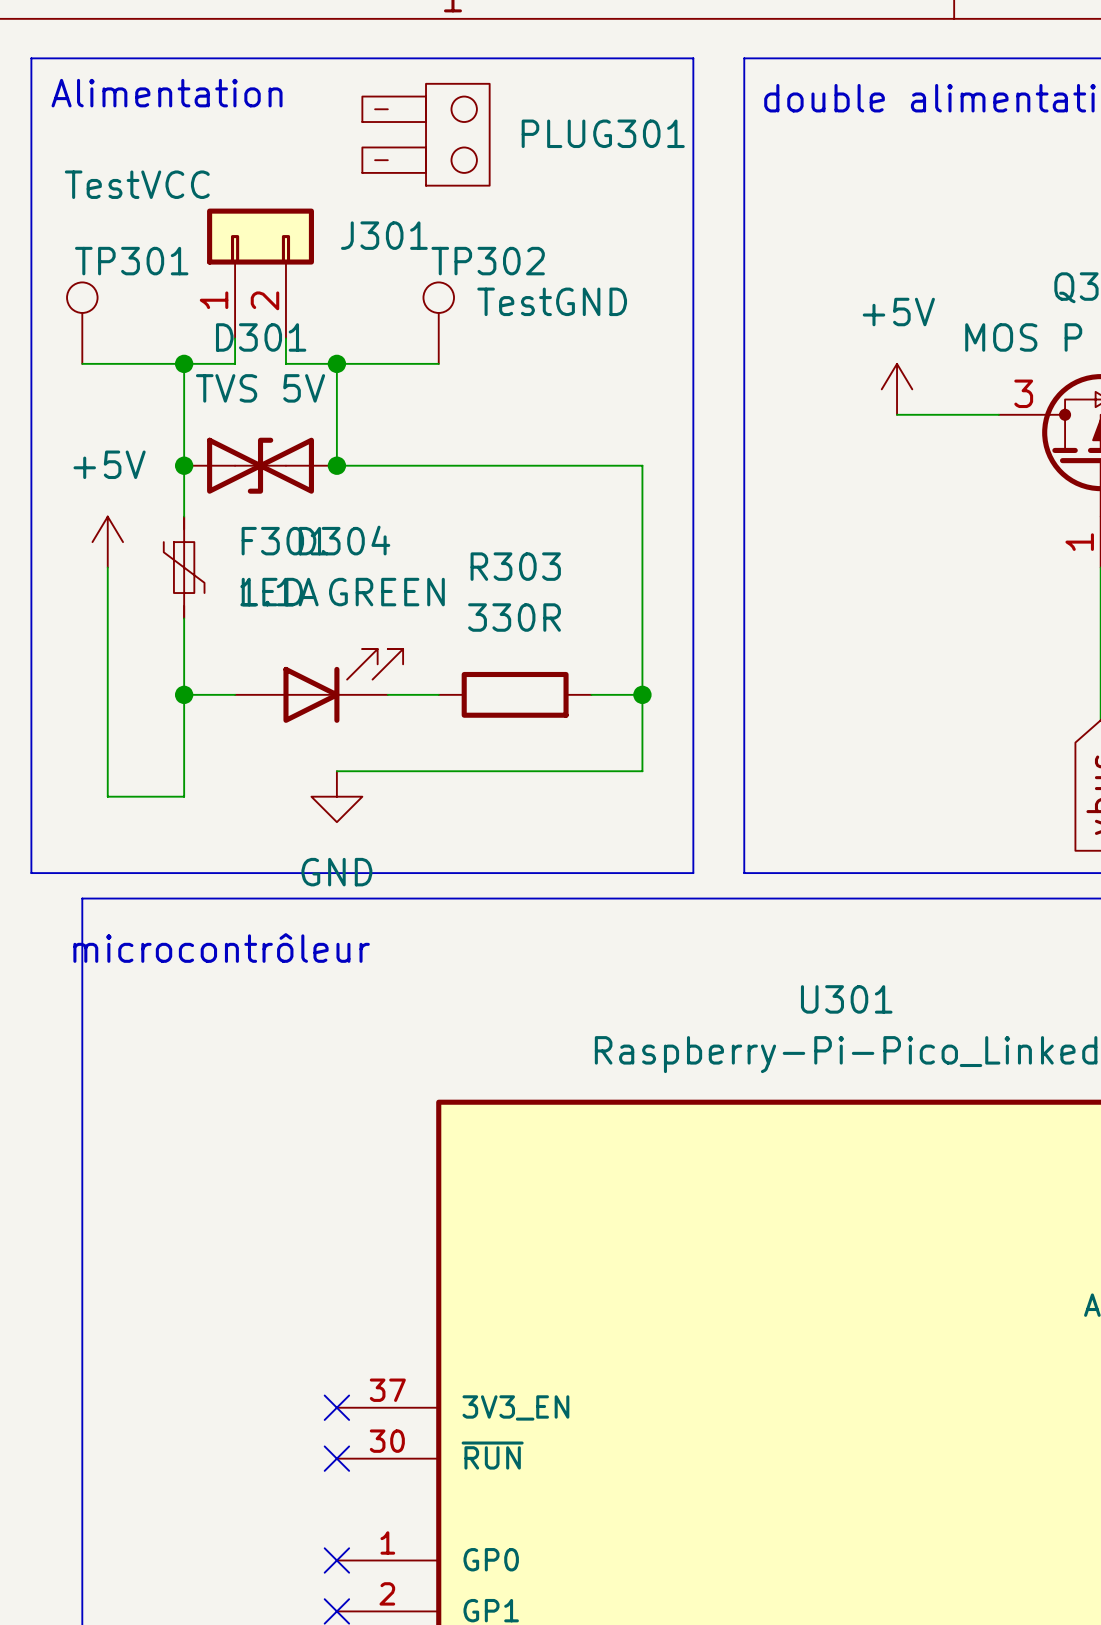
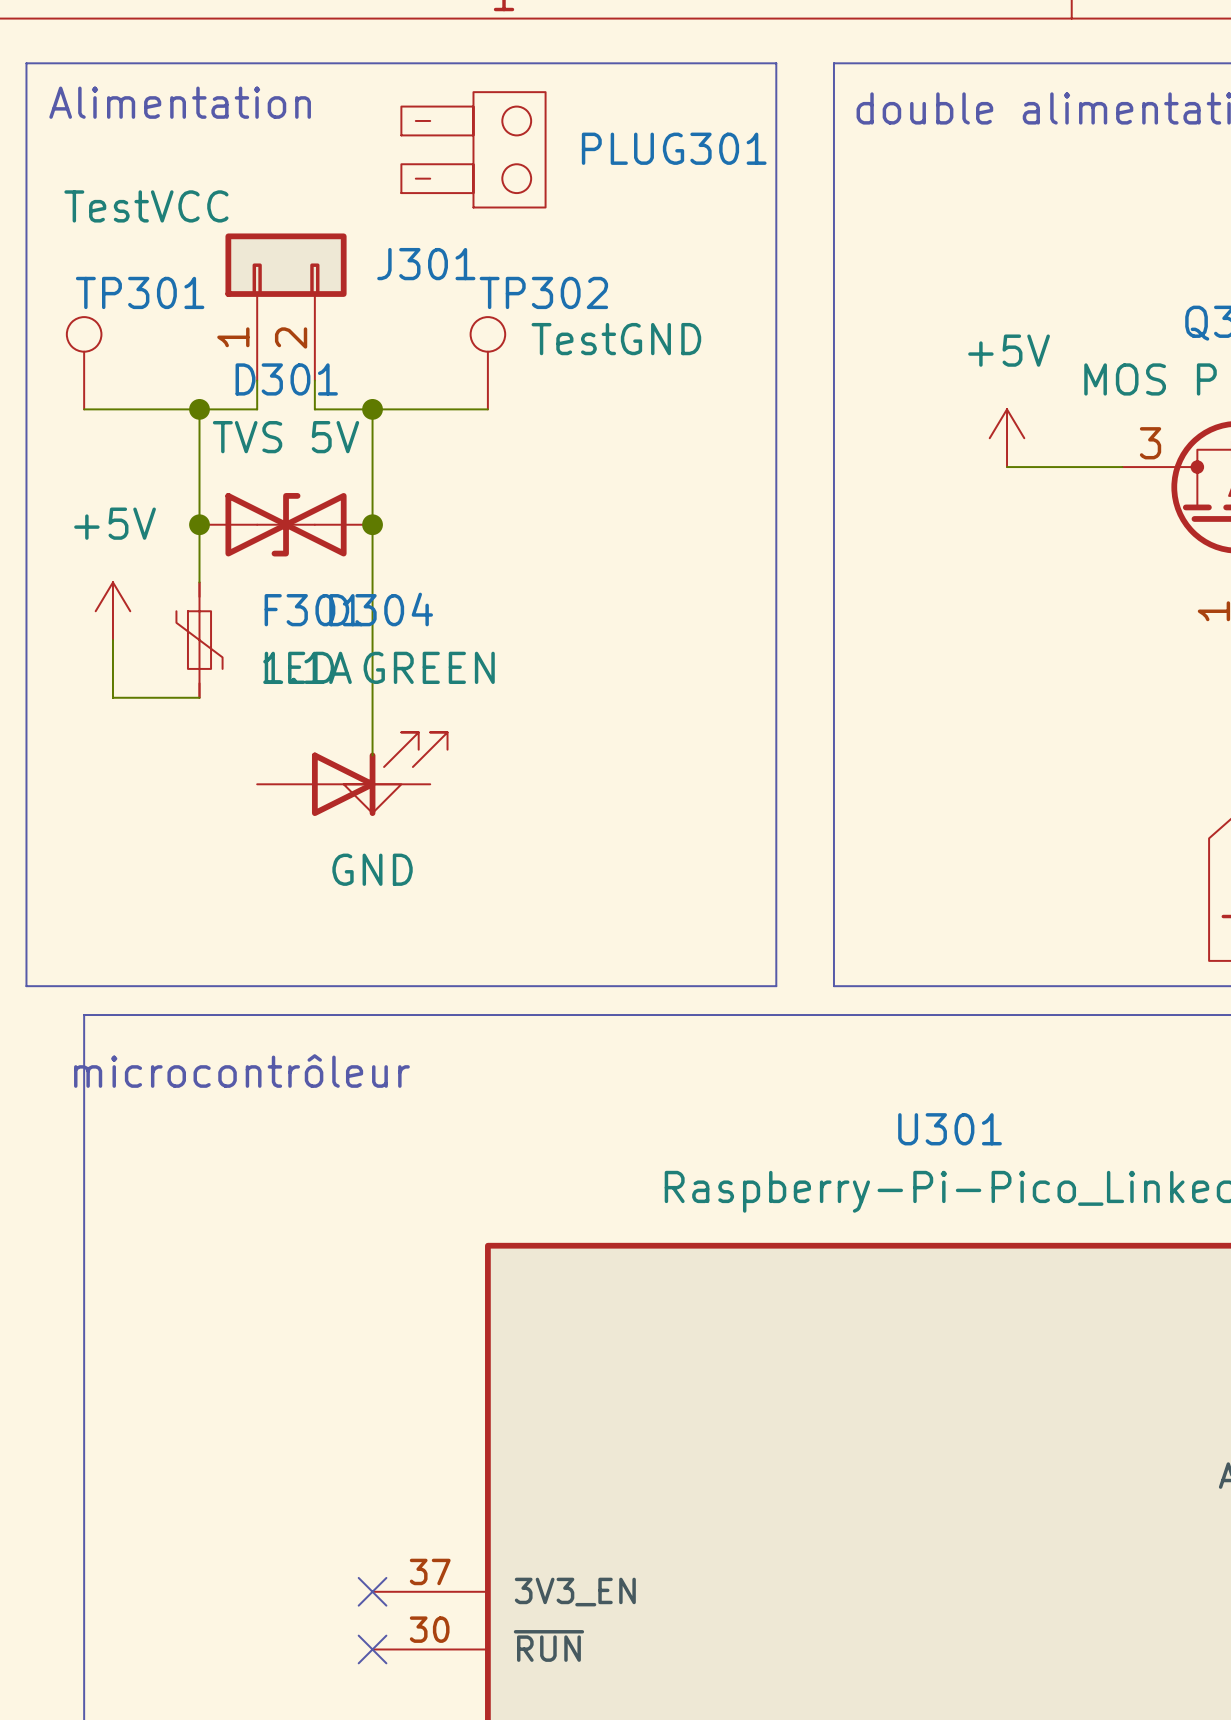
wire: (336, 465) (642, 465) (642, 771) (336, 771) -> (372, 524) (372, 755)
wire: (107, 618) (107, 796) (184, 796) (184, 618) -> (112, 697) (199, 697)
wire: (184, 694) (235, 694) -> none
junction: (184, 694) -> none
wire: (387, 694) (438, 694) -> none
R303: 330R (515, 694) -> none
wire: (591, 694) (642, 694) -> none
junction: (642, 694) -> none
power symbol position: GND (336, 796) -> GND (372, 784)

